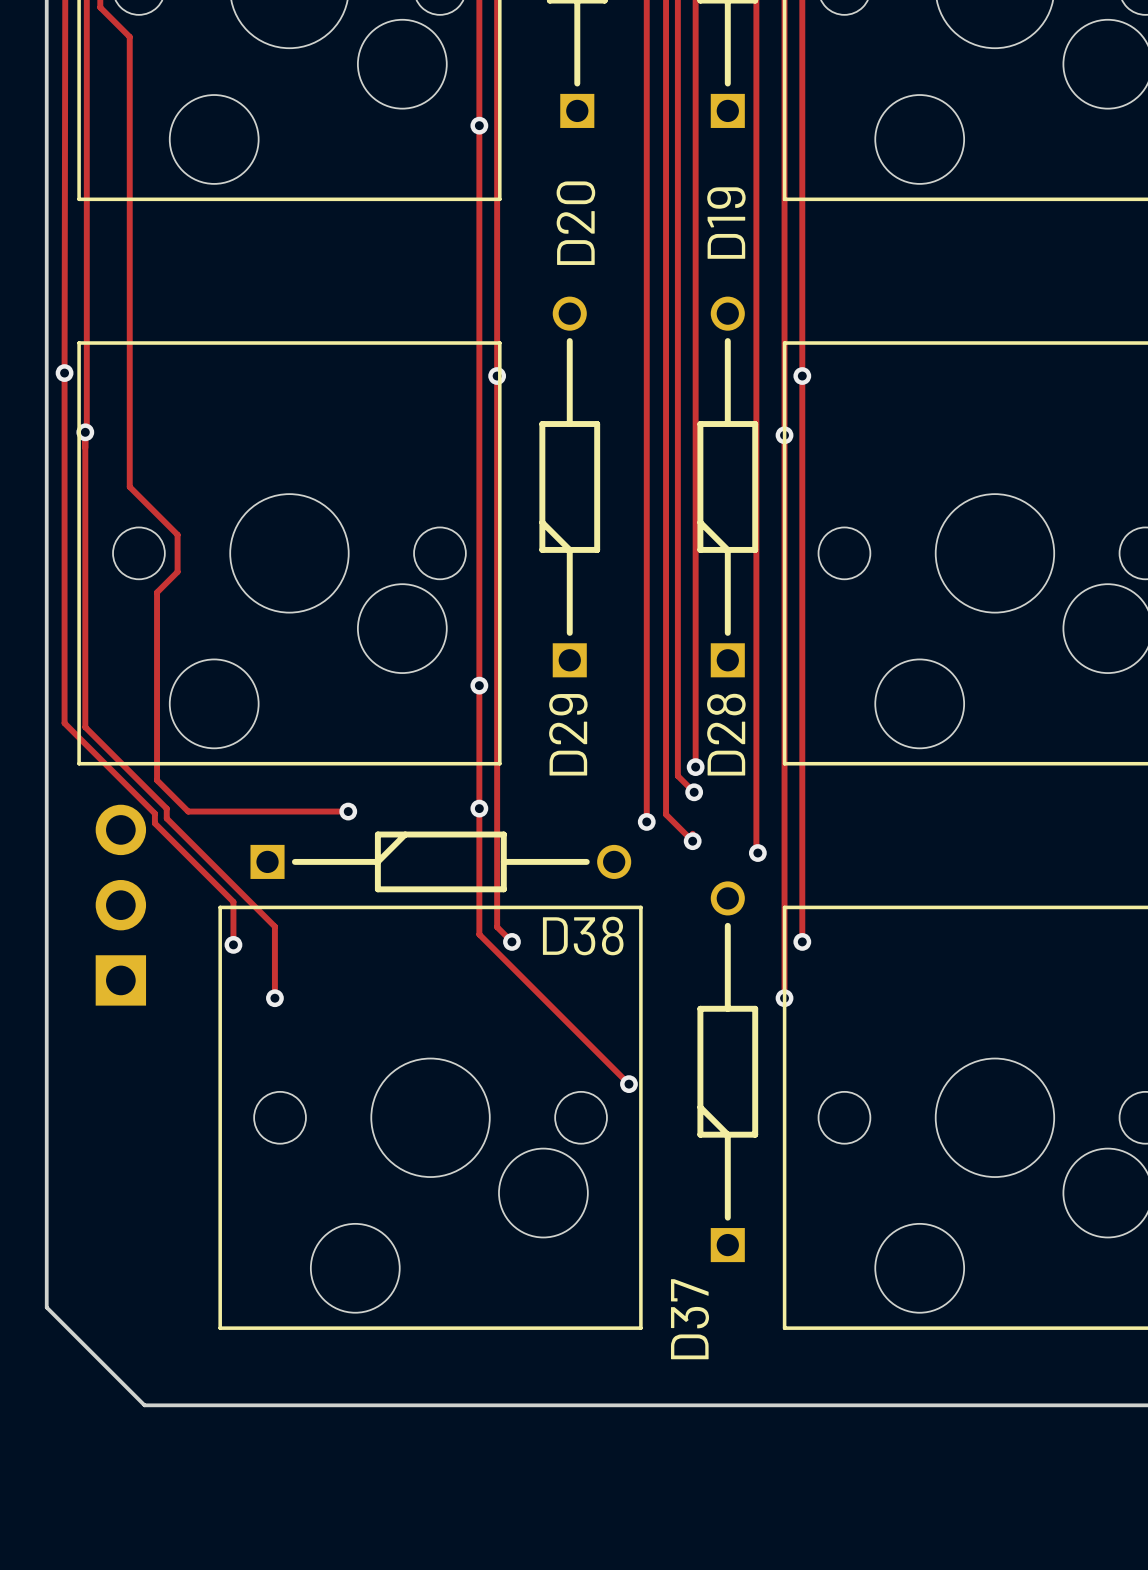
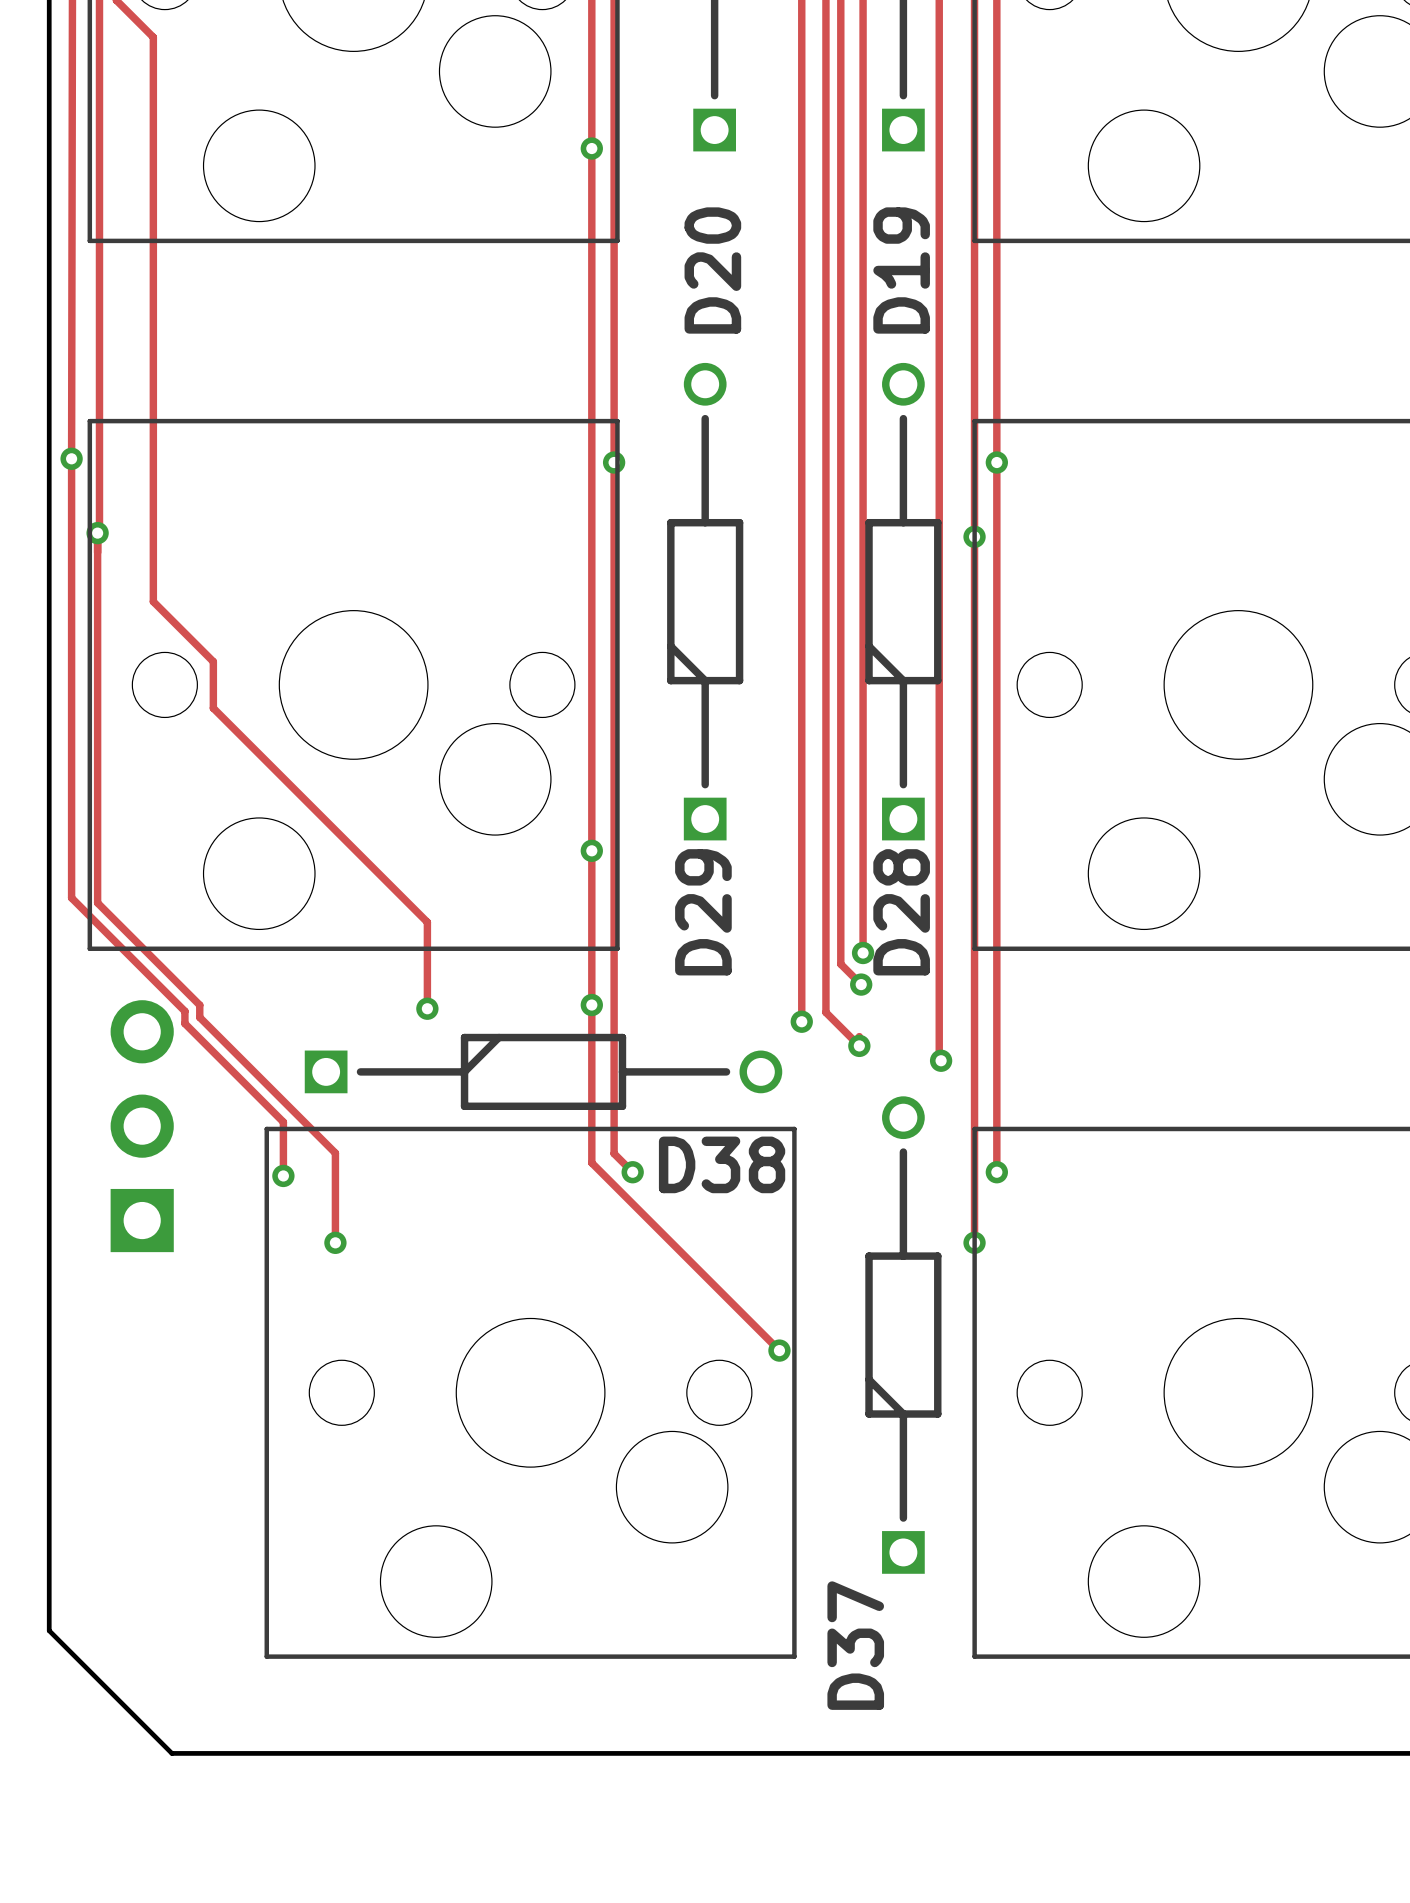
track: (177, 571) (157, 592) (157, 780) (188, 811) (348, 811) -> (213, 708) (427, 922) (427, 1008)

